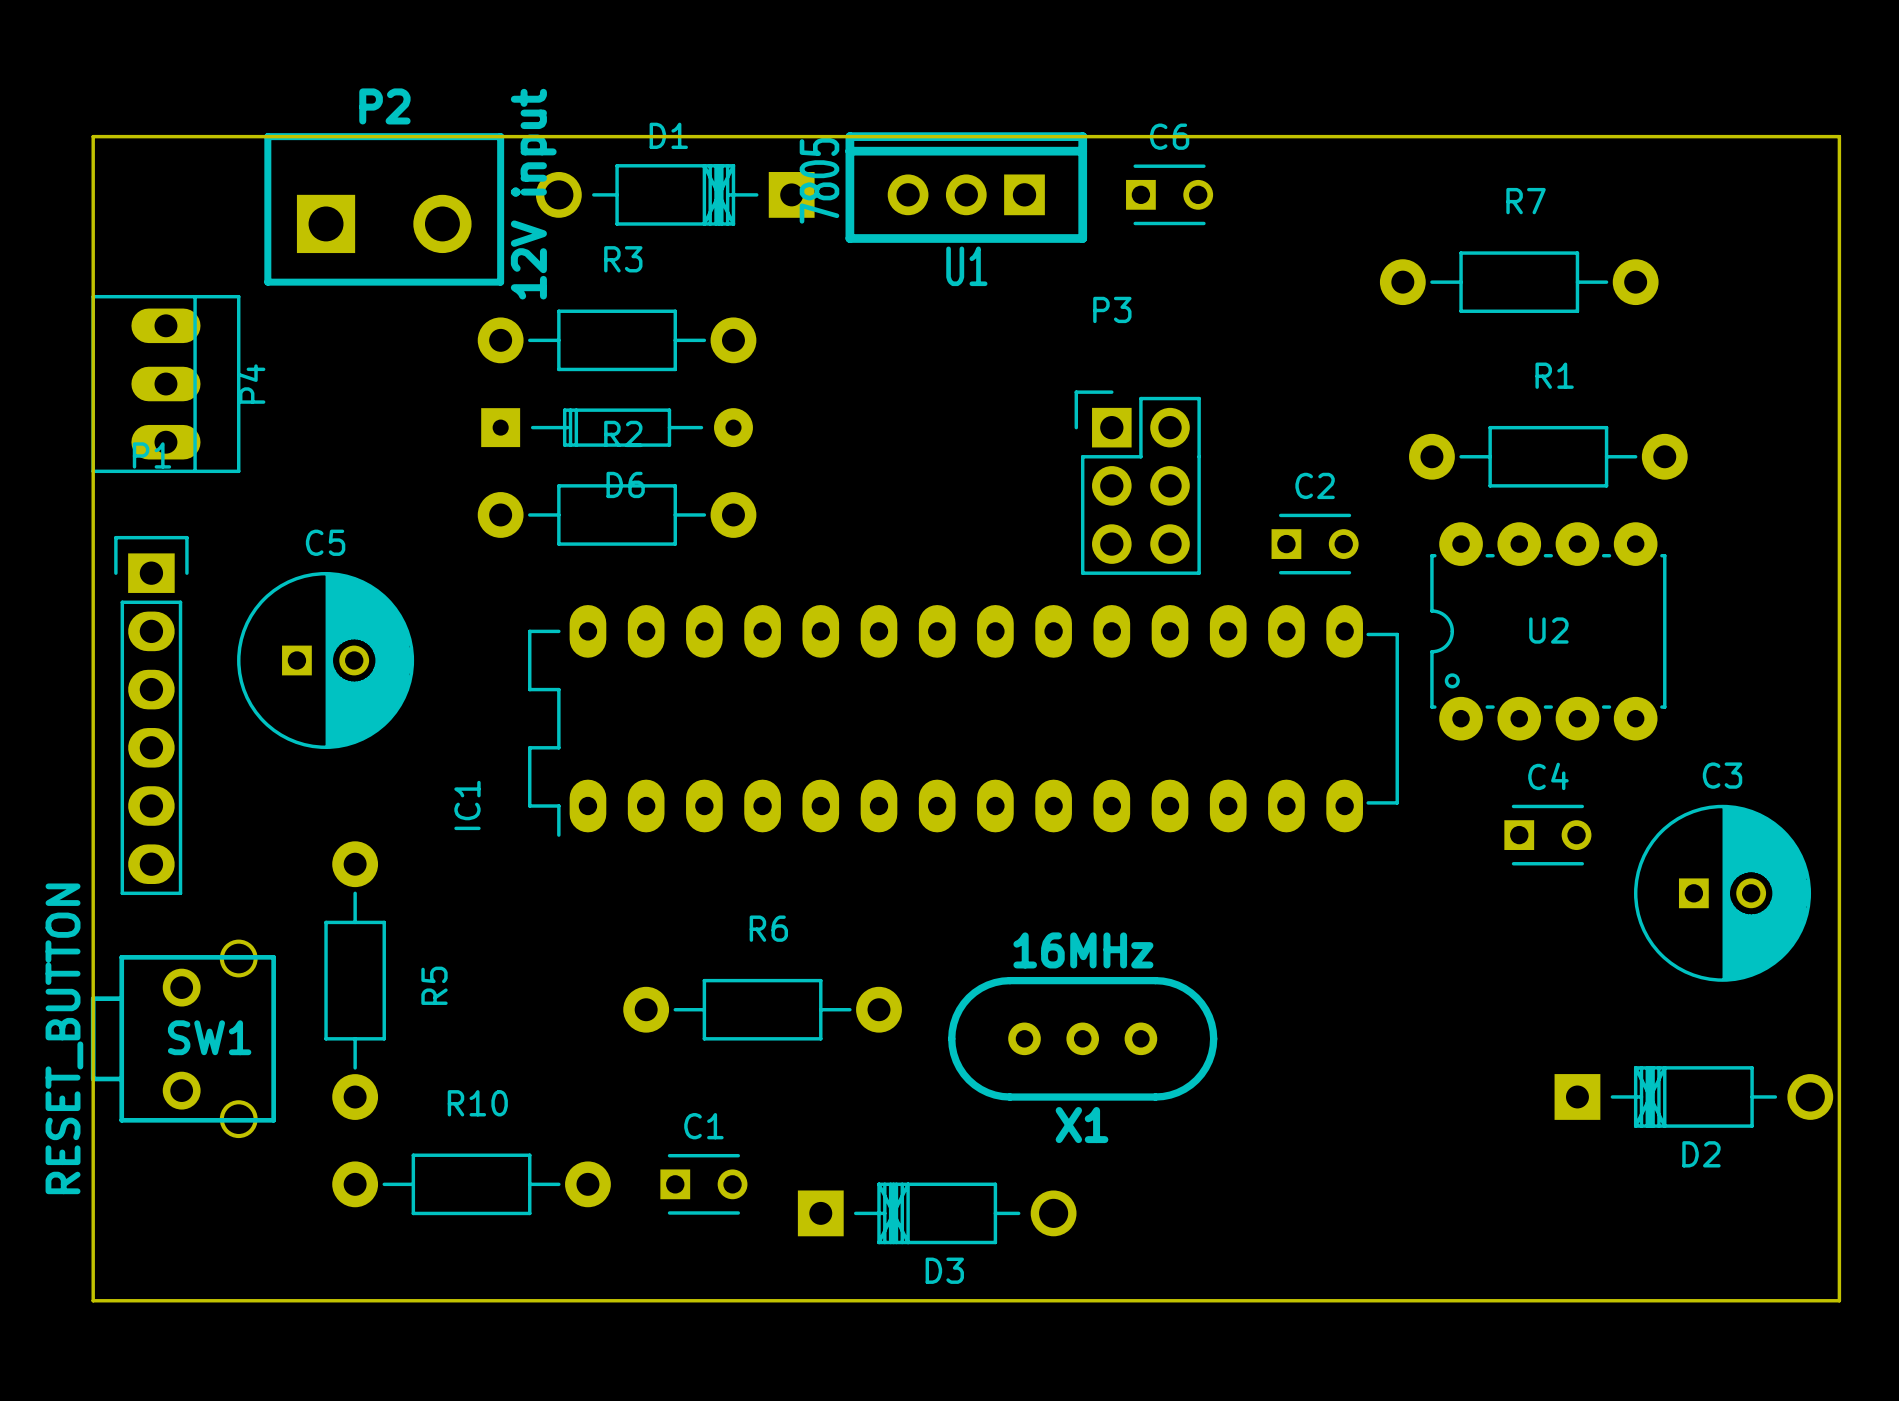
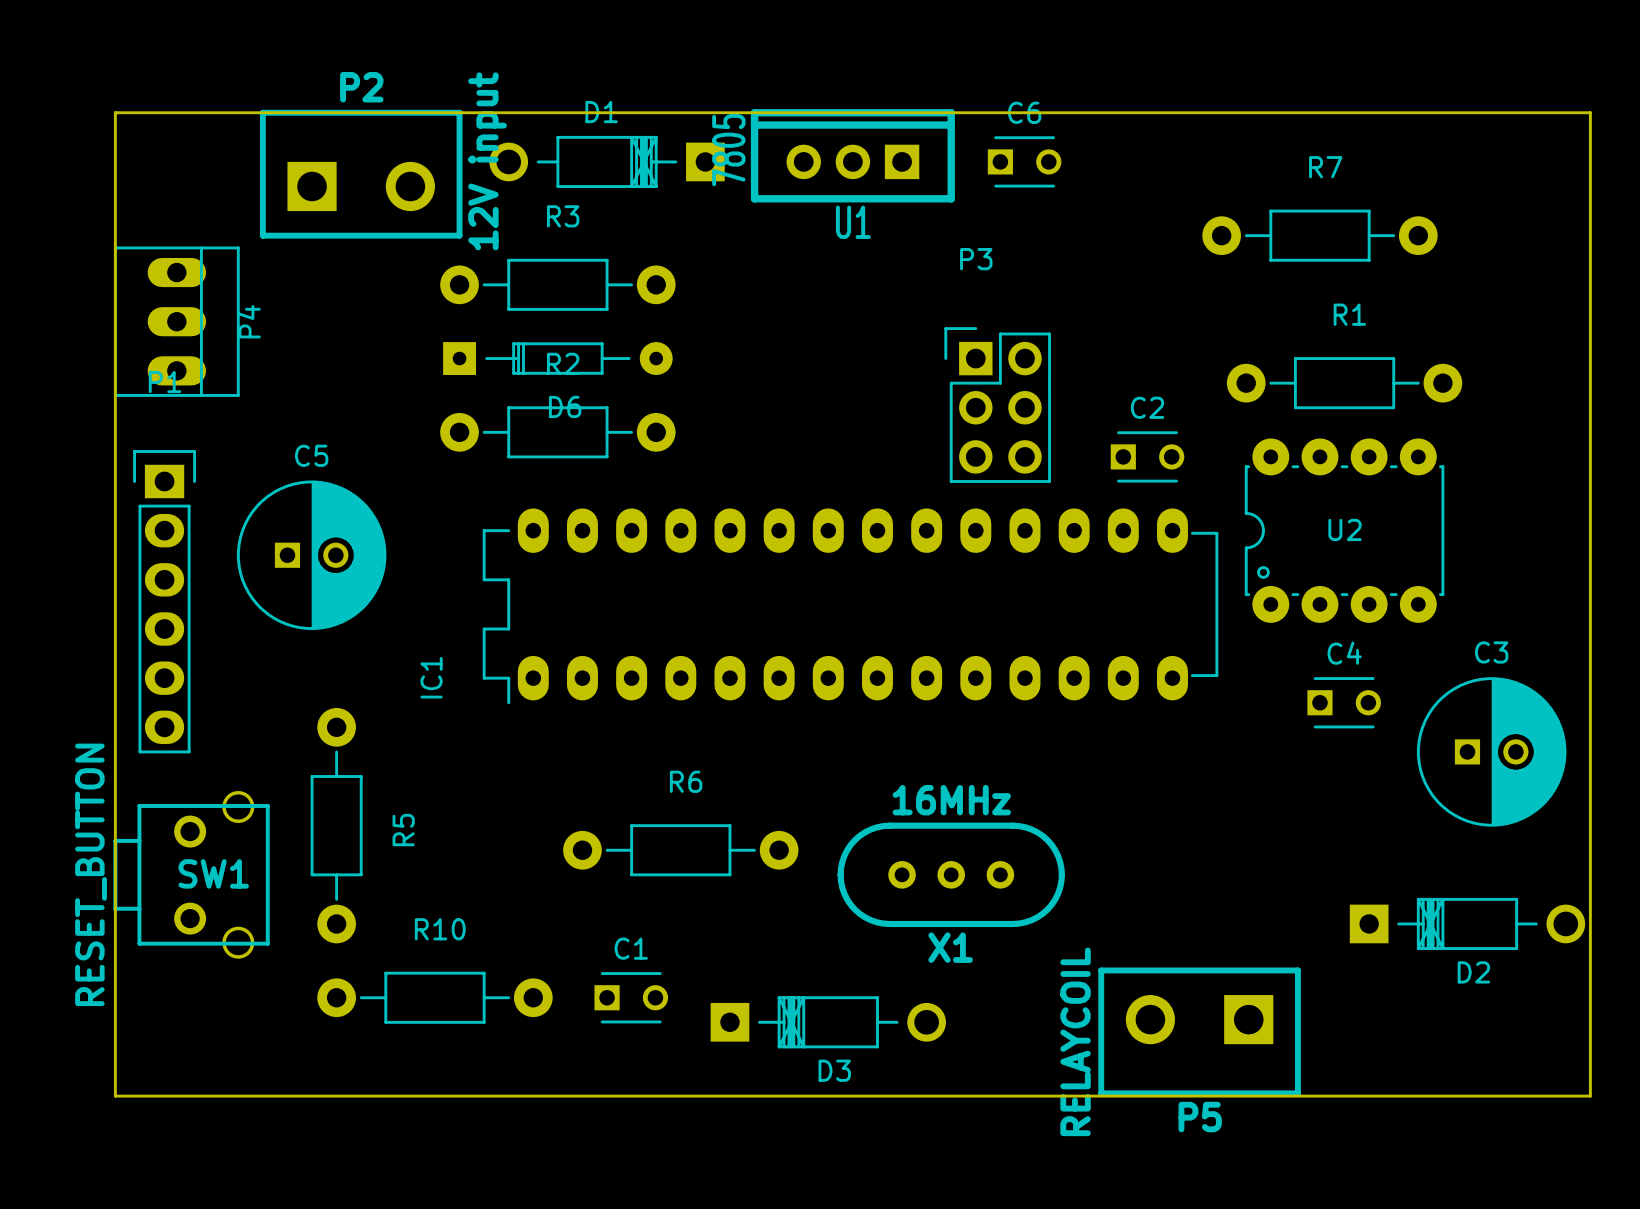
P5: none -> RELAYCOIL (1199, 1031)

